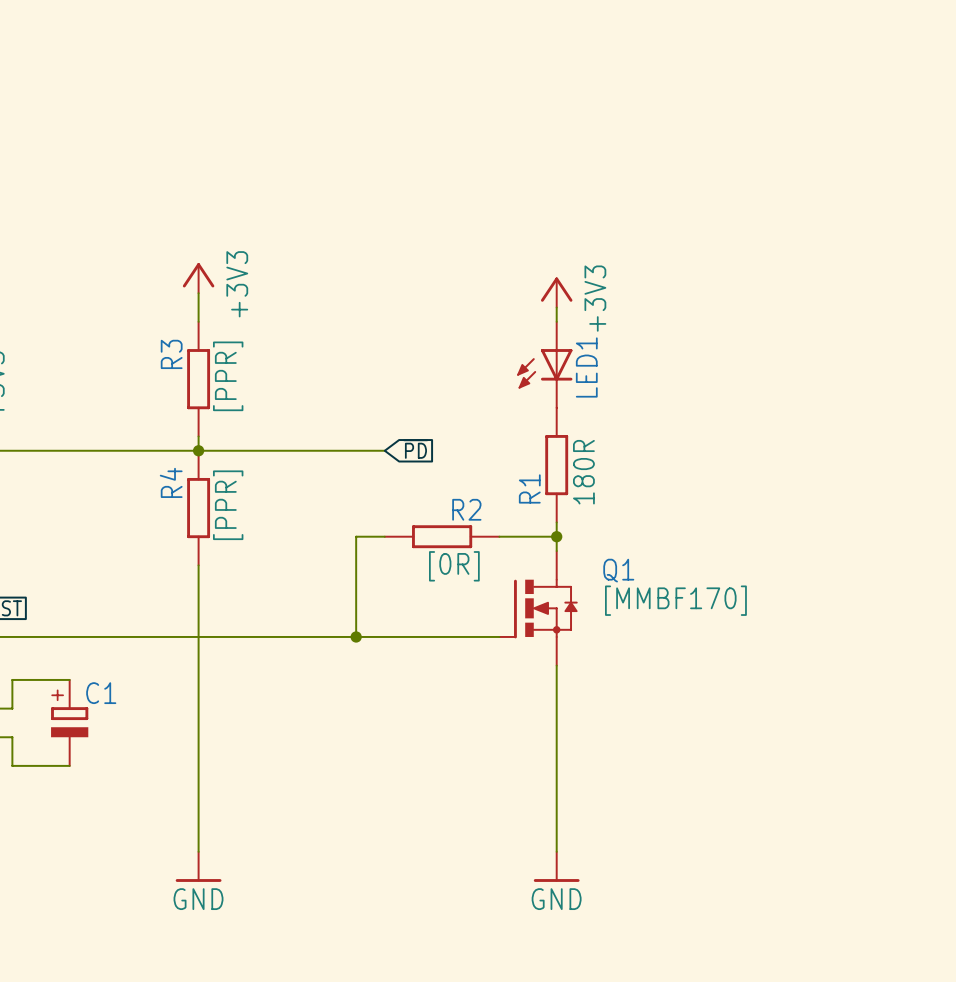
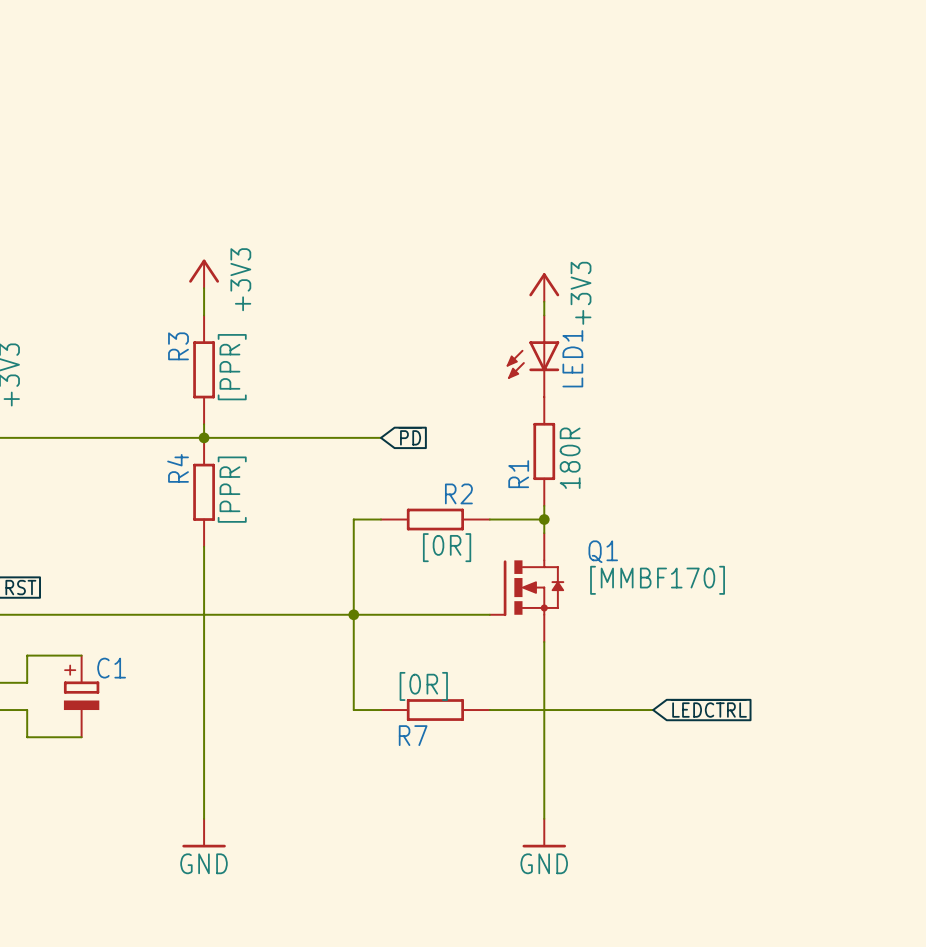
wire: none -> (353, 614) (353, 710) (380, 710)
global label: none -> ~{LEDCTRL} (708, 708)
R7: none -> [0R] (435, 710)
wire: none -> (489, 710) (653, 710)

